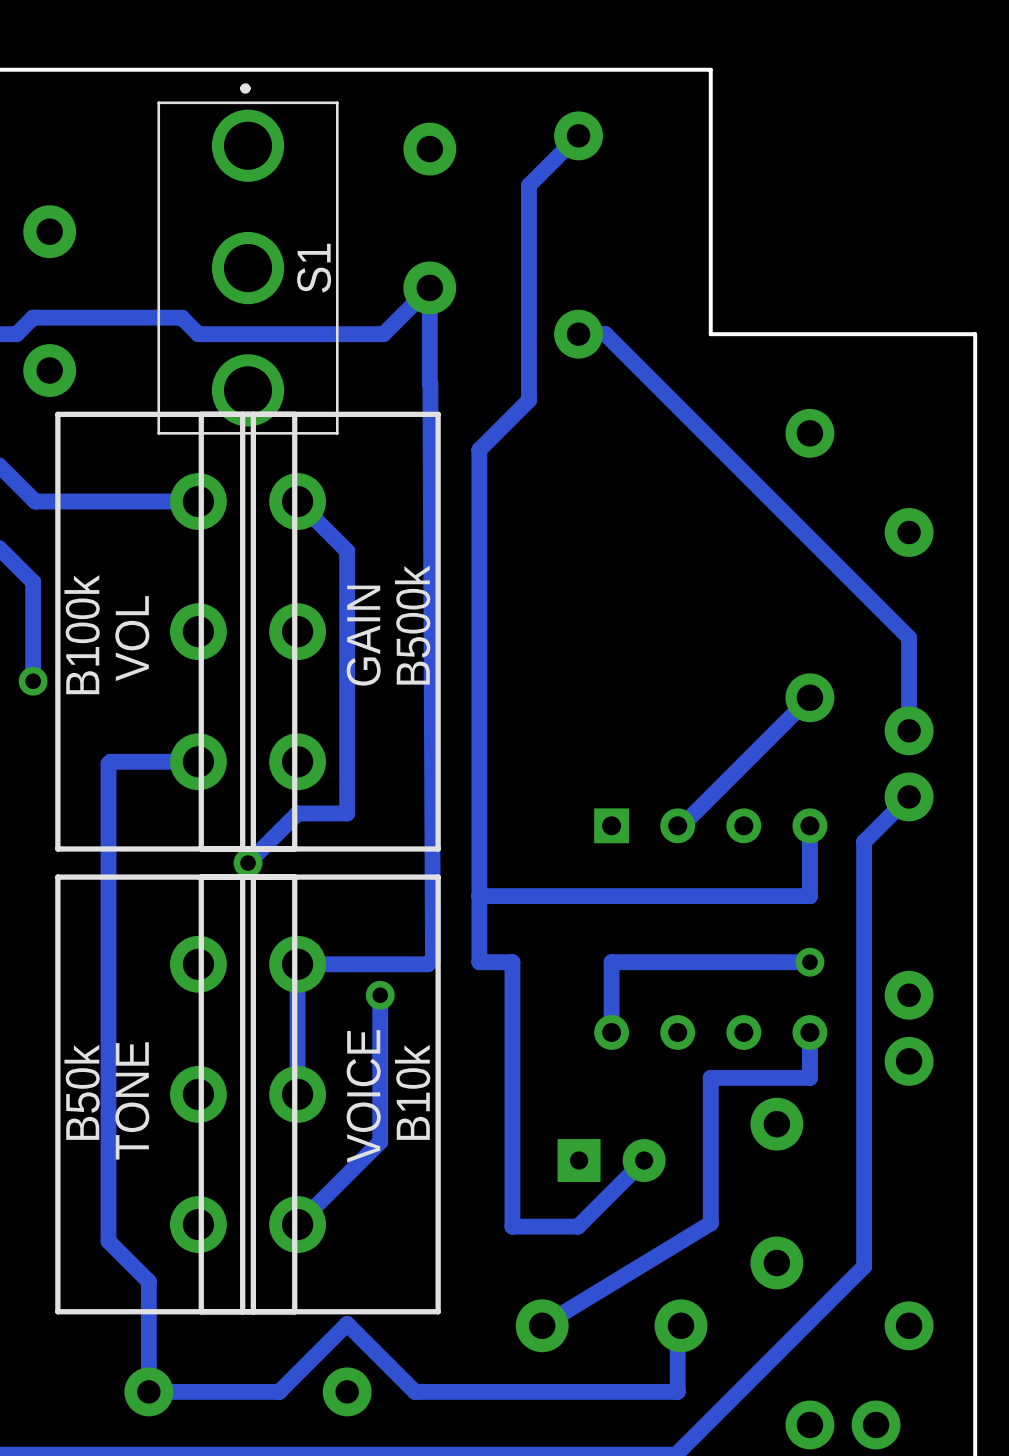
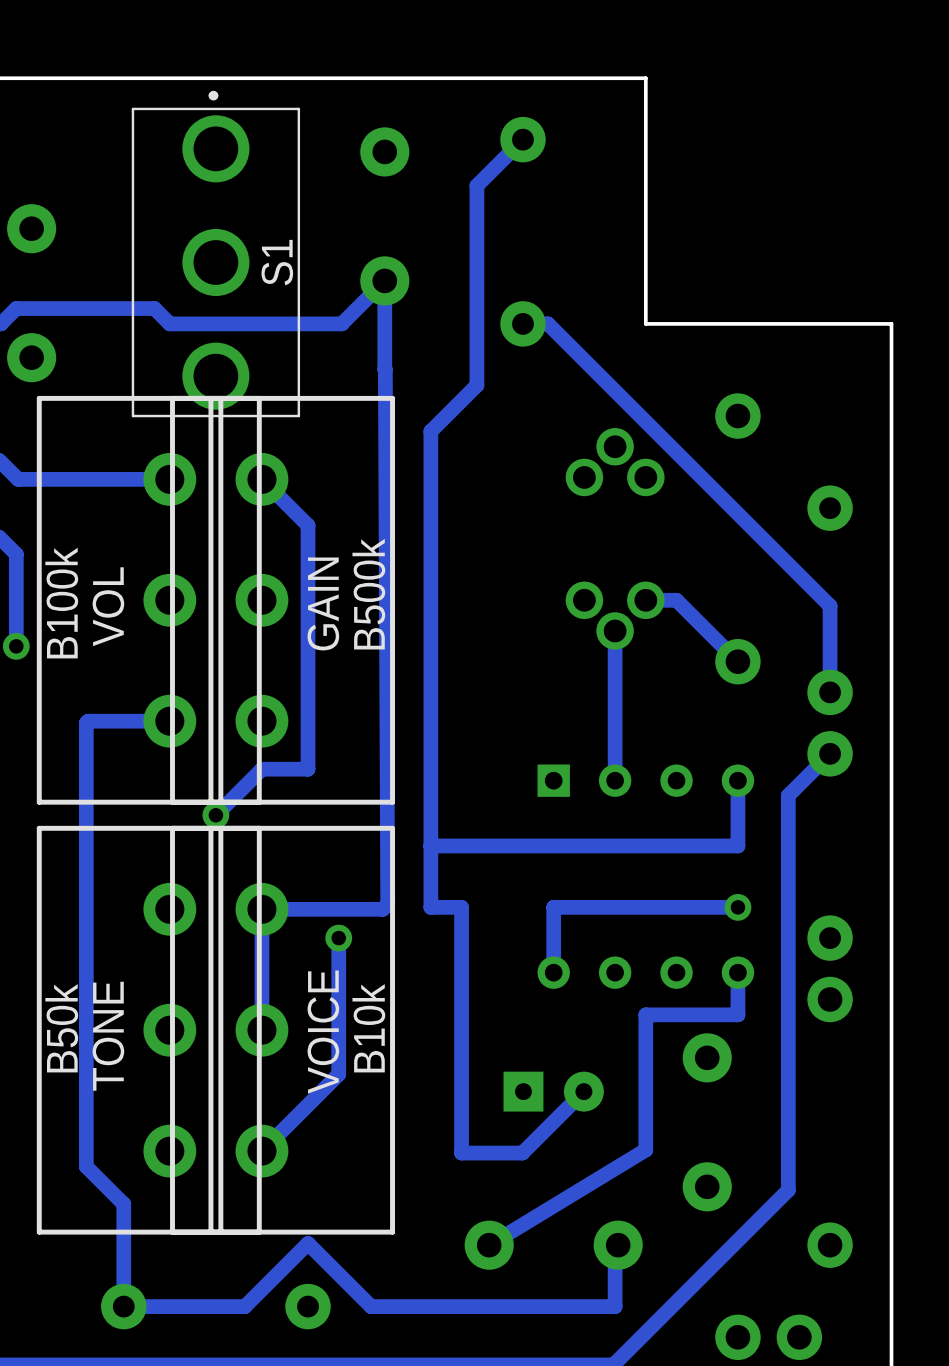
part: none -> (615, 462)
track: none -> (645, 600) (676, 600) (737, 661)
part: none -> (615, 615)
track: (809, 697) (681, 825) (677, 825) -> (615, 630) (615, 780)

